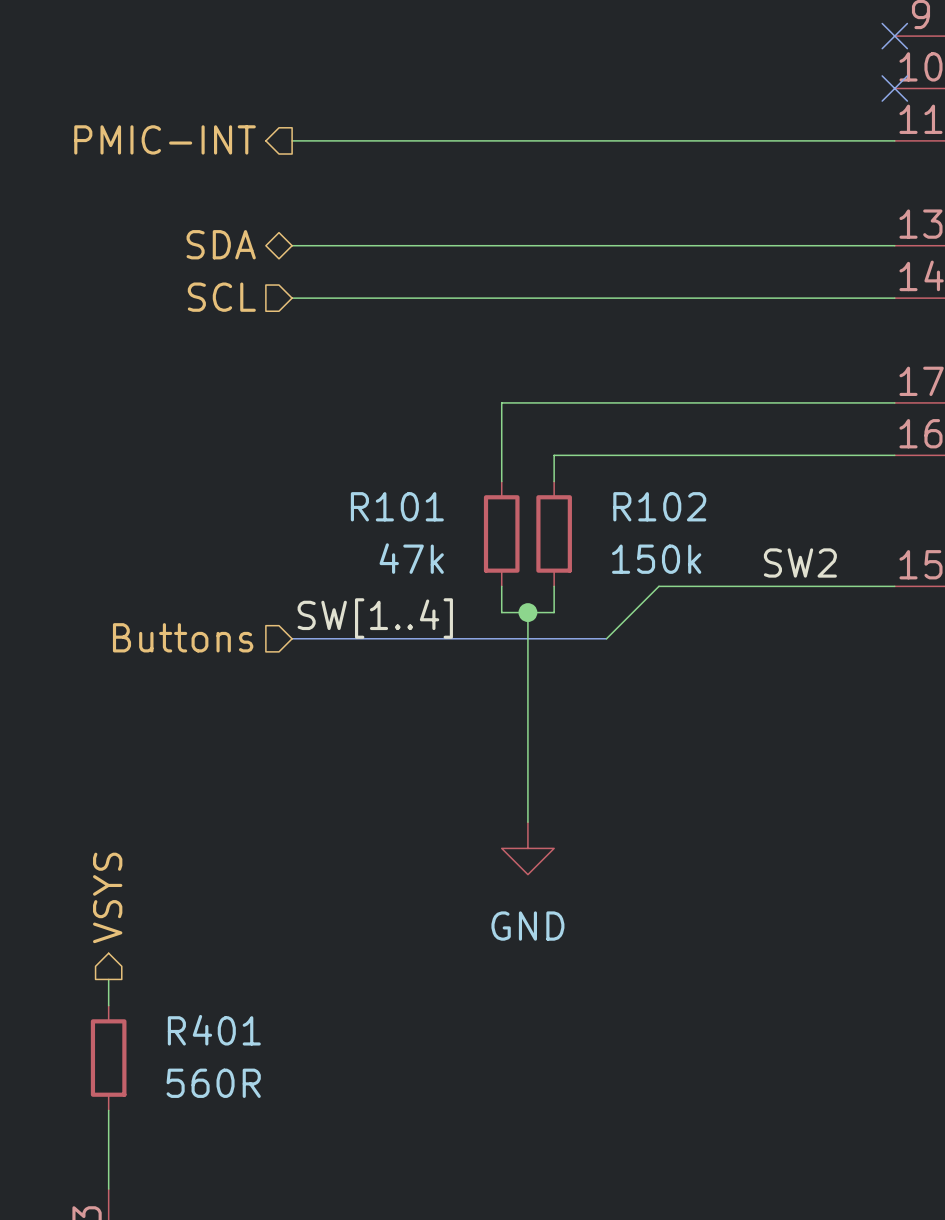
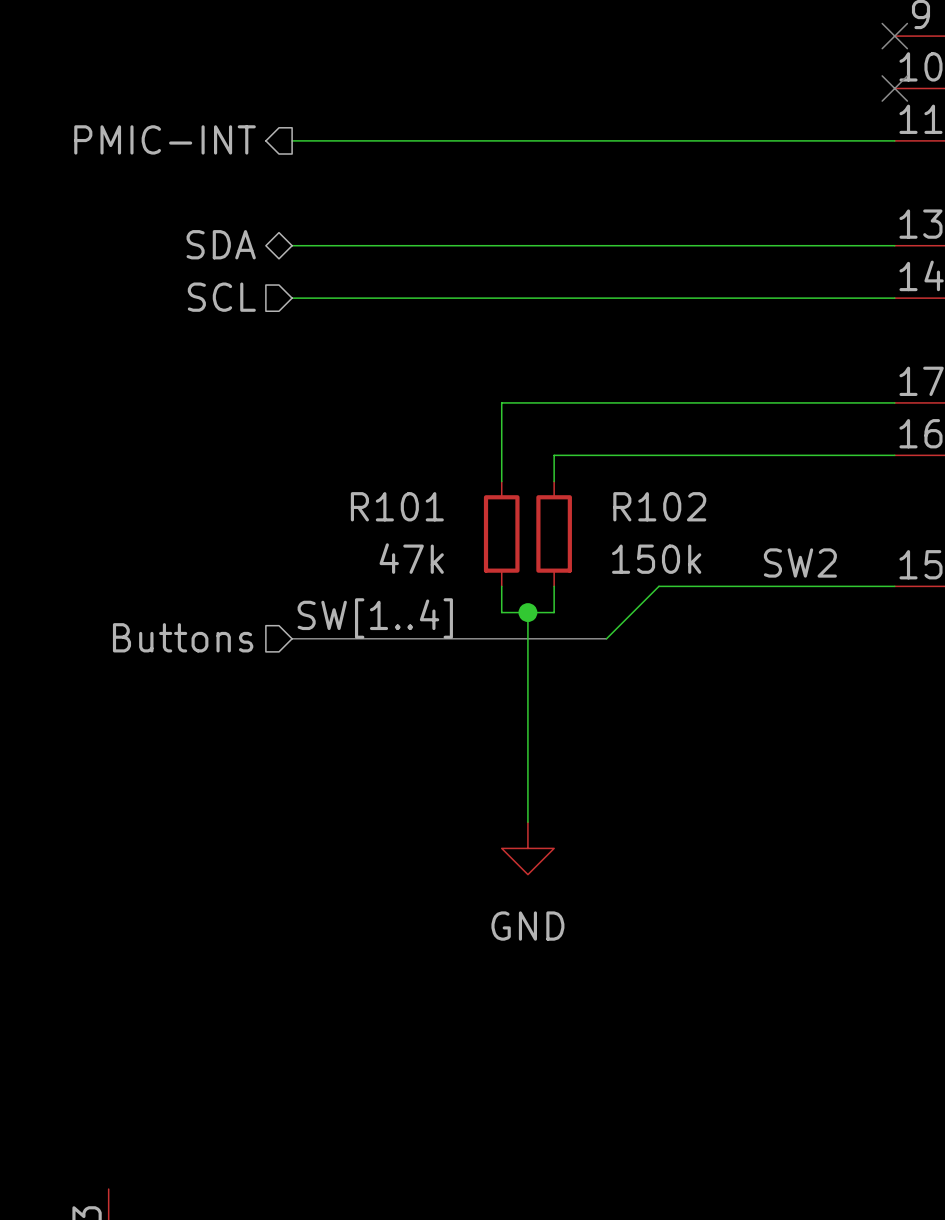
hierarchical label: VSYS (107, 897) -> none
wire: (108, 979) (108, 1005) -> none
R401: 560R (108, 1058) -> none
wire: (108, 1110) (108, 1189) -> none

